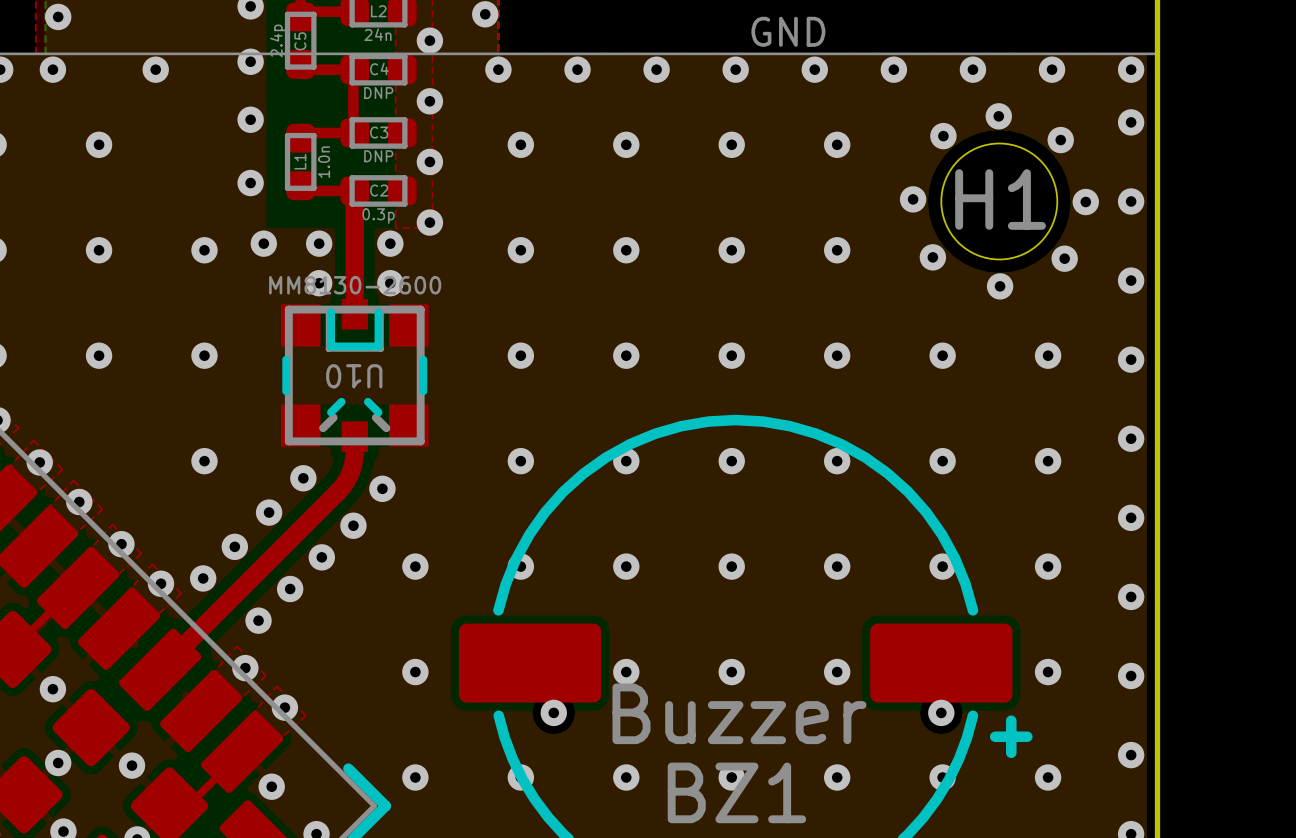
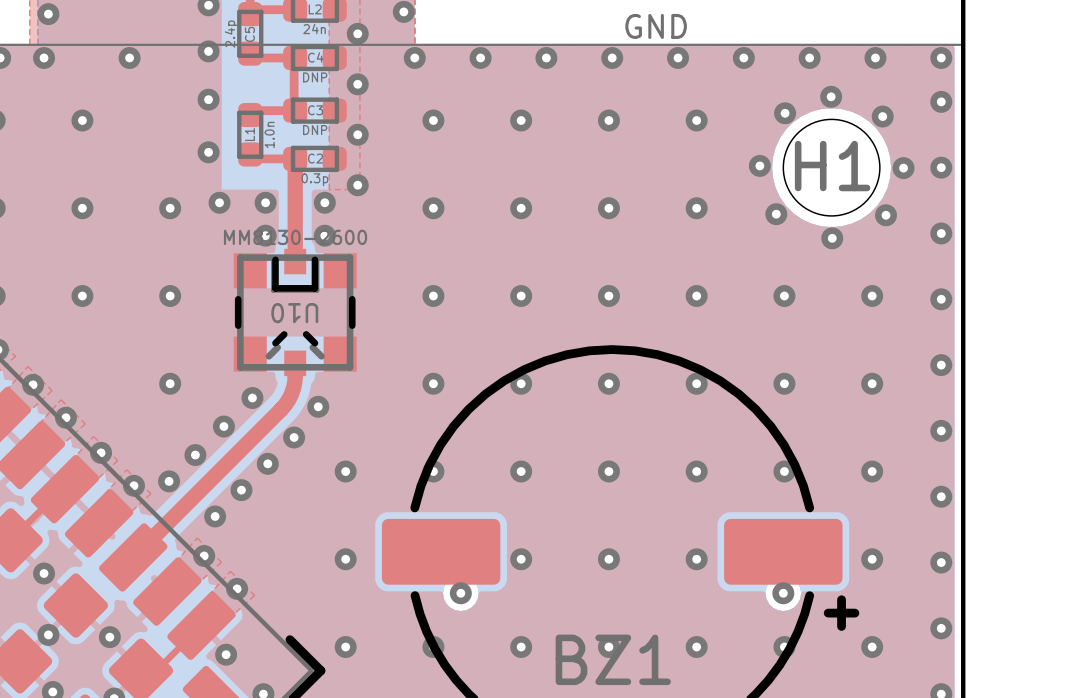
BZ1 value: Buzzer (739, 713) -> none

